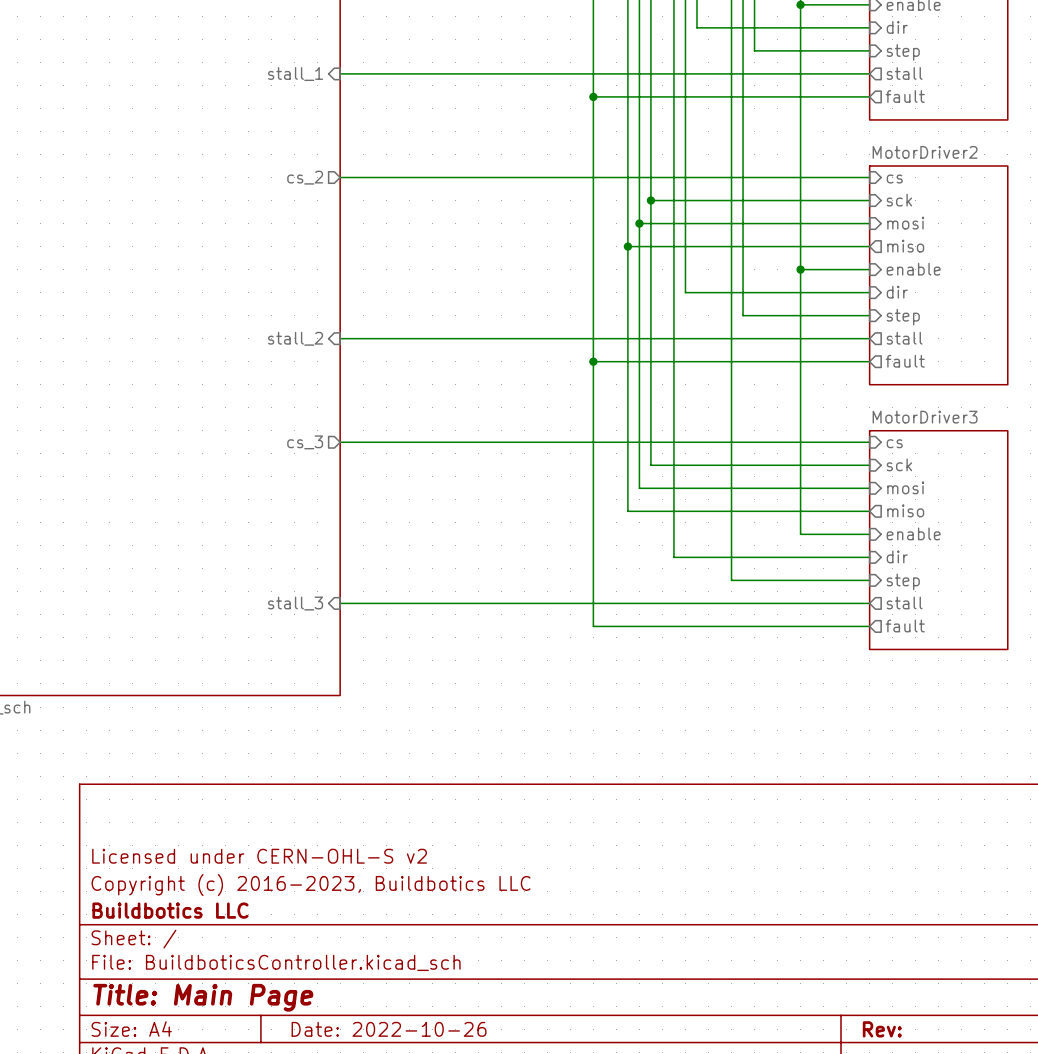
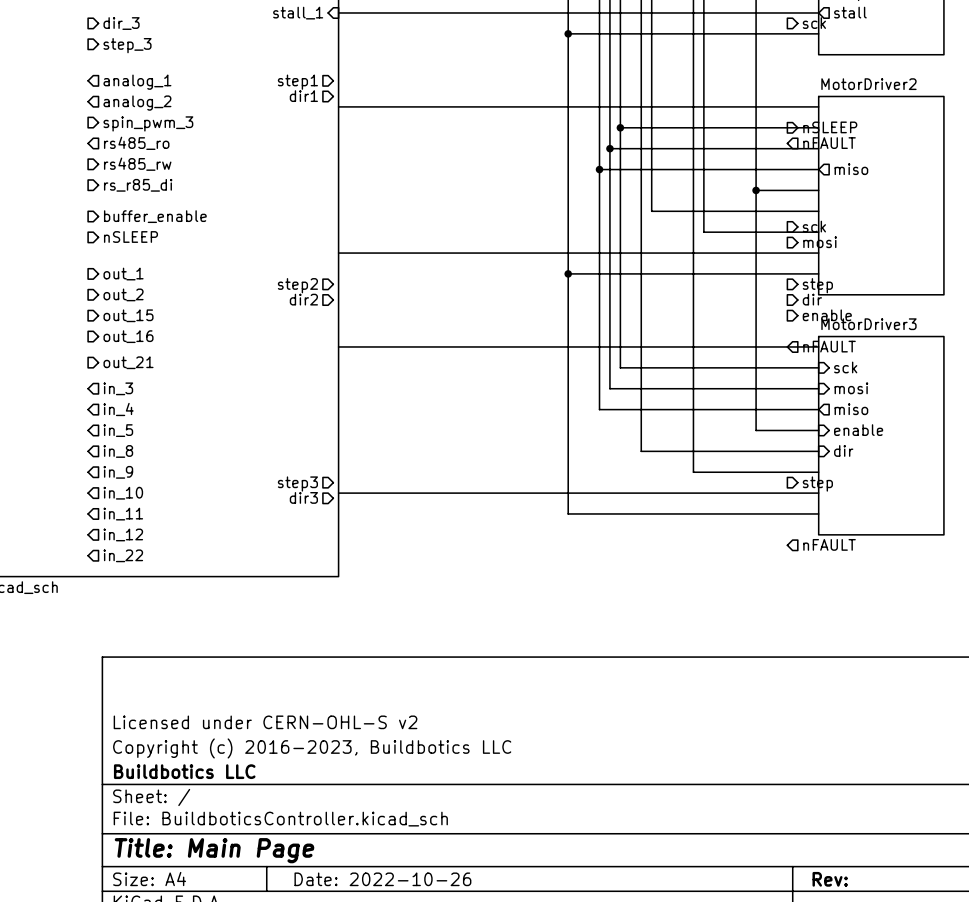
sheet pin: none -> sck (814, 23)
sheet pin: none -> dir_3 (121, 23)
sheet pin: fault (905, 96) -> none
sheet pin: none -> step_3 (127, 45)
sheet pin: none -> analog_1 (137, 82)
sheet pin: none -> step1 (297, 82)
sheet pin: none -> dir1 (303, 96)
sheet pin: none -> analog_2 (137, 103)
sheet pin: cs_2 (305, 177) -> none
sheet pin: cs (894, 179) -> none
sheet pin: none -> spin_pwm_3 (148, 123)
sheet pin: none -> nSLEEP (830, 127)
sheet pin: sck (899, 200) -> none
sheet pin: none -> rs485_ro (136, 143)
sheet pin: none -> nFAULT (829, 143)
sheet pin position: mosi (905, 223) -> mosi (820, 242)
sheet pin: none -> rs485_rw (137, 164)
sheet pin: none -> rs_r85_di (138, 185)
sheet pin position: enable (913, 269) -> enable (827, 315)
sheet pin position: dir (897, 292) -> dir (812, 299)
sheet pin: none -> buffer_enable (155, 216)
sheet pin: none -> sck (814, 226)
sheet pin position: step (903, 317) -> step (817, 285)
sheet pin: none -> nSLEEP (130, 237)
sheet pin: stall_2 (295, 338) -> none
sheet pin: stall (904, 338) -> none
sheet pin: none -> out_1 (123, 274)
sheet pin: fault (905, 361) -> none
sheet pin: none -> step2 (297, 285)
sheet pin: none -> out_2 (123, 294)
sheet pin: none -> dir2 (303, 299)
sheet pin: none -> out_15 (128, 315)
sheet pin: none -> out_16 (128, 336)
sheet pin: none -> nFAULT (829, 346)
sheet pin: cs_3 (305, 442) -> none
sheet pin: cs (894, 443) -> none
sheet pin: none -> out_21 (128, 362)
sheet pin: none -> in_3 (118, 388)
sheet pin: none -> in_4 (118, 409)
sheet pin: none -> in_5 (118, 430)
sheet pin: none -> in_8 (118, 451)
sheet pin: none -> in_9 (118, 472)
sheet pin position: step (903, 581) -> step (817, 484)
sheet pin: none -> step3 (297, 484)
sheet pin: stall (904, 602) -> none
sheet pin: none -> in_10 (123, 493)
sheet pin: stall_3 (295, 603) -> none
sheet pin: none -> dir3 (303, 497)
sheet pin: none -> in_11 (123, 514)
sheet pin: fault (905, 626) -> none
sheet pin: none -> in_12 (123, 534)
sheet pin: none -> nFAULT (829, 544)
sheet pin: none -> in_22 (123, 555)

